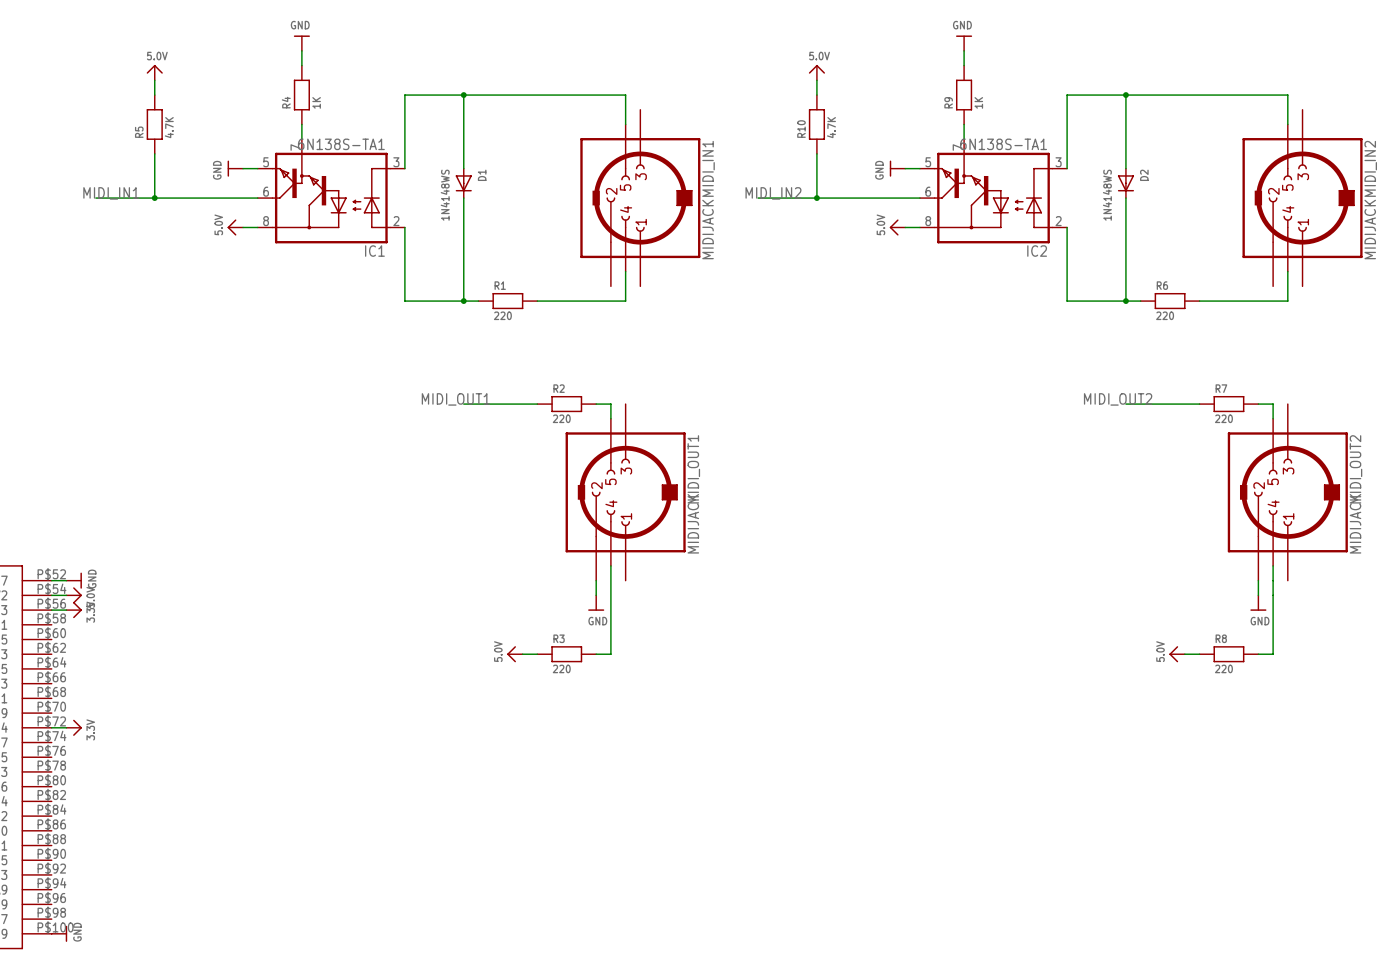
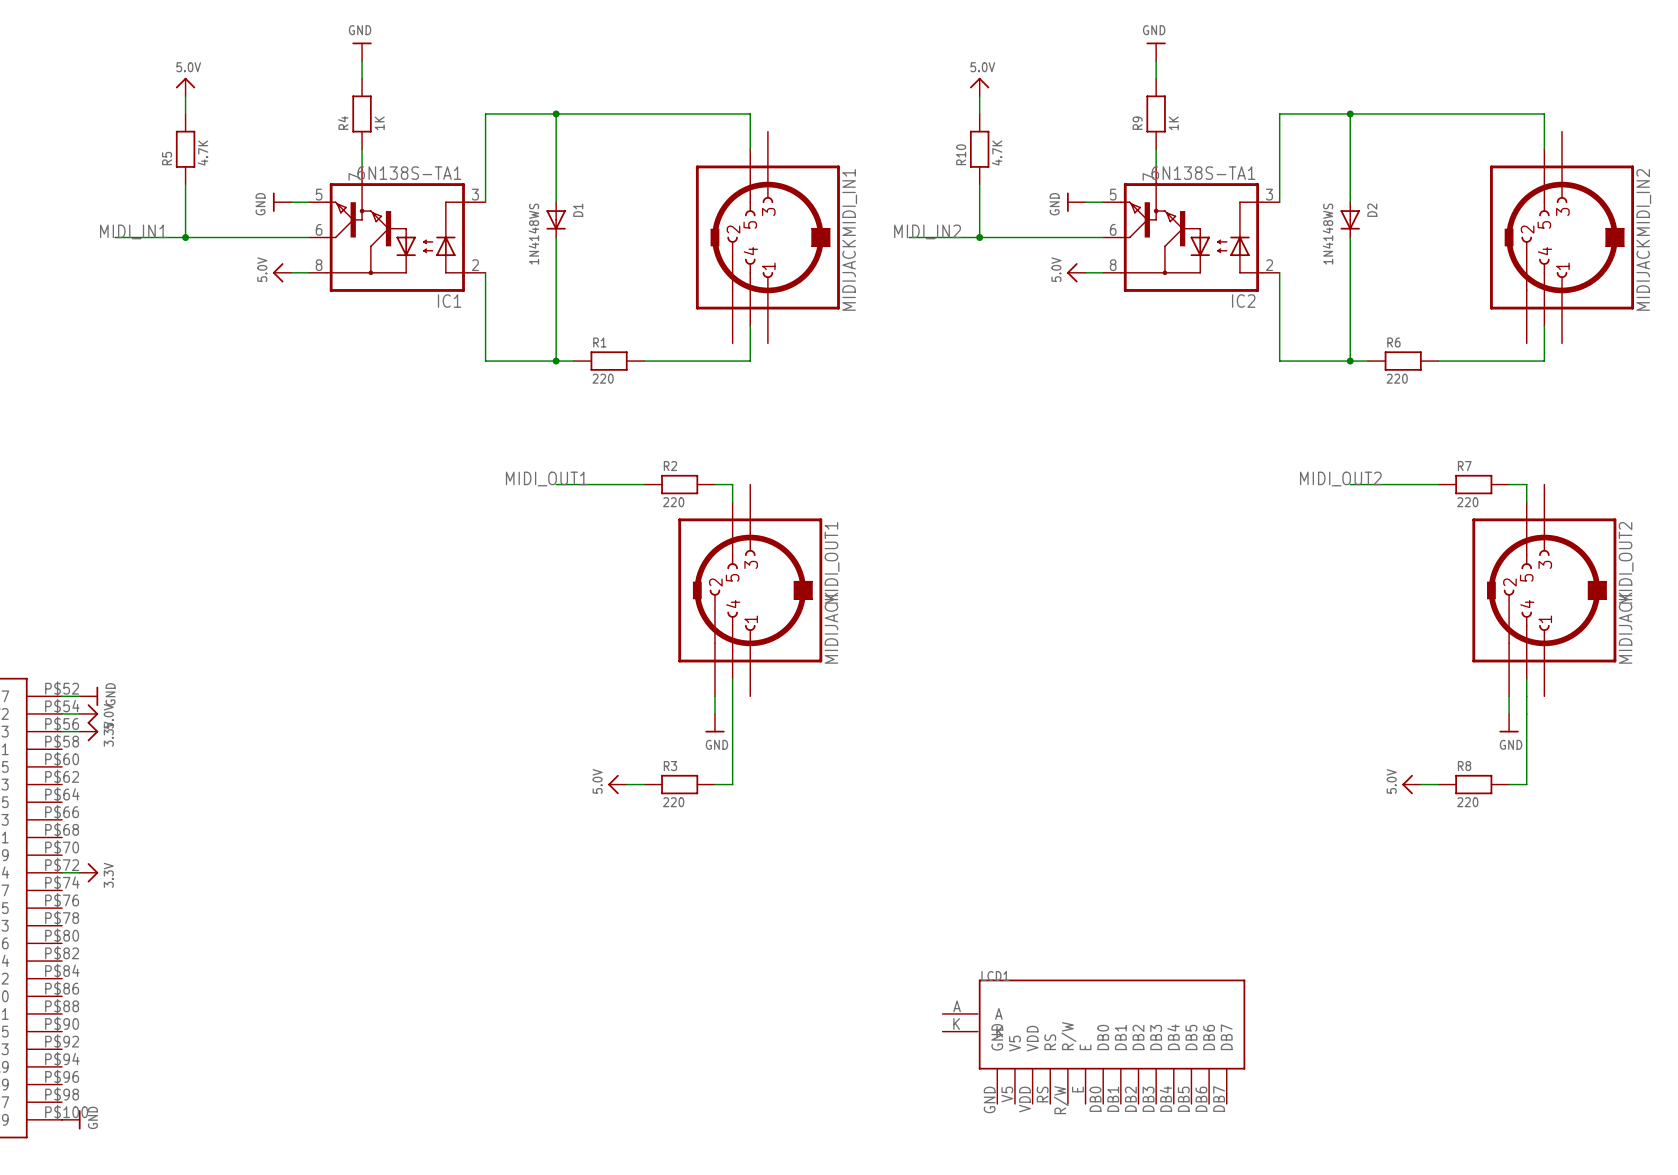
LCD1: none -> (1093, 1041)

